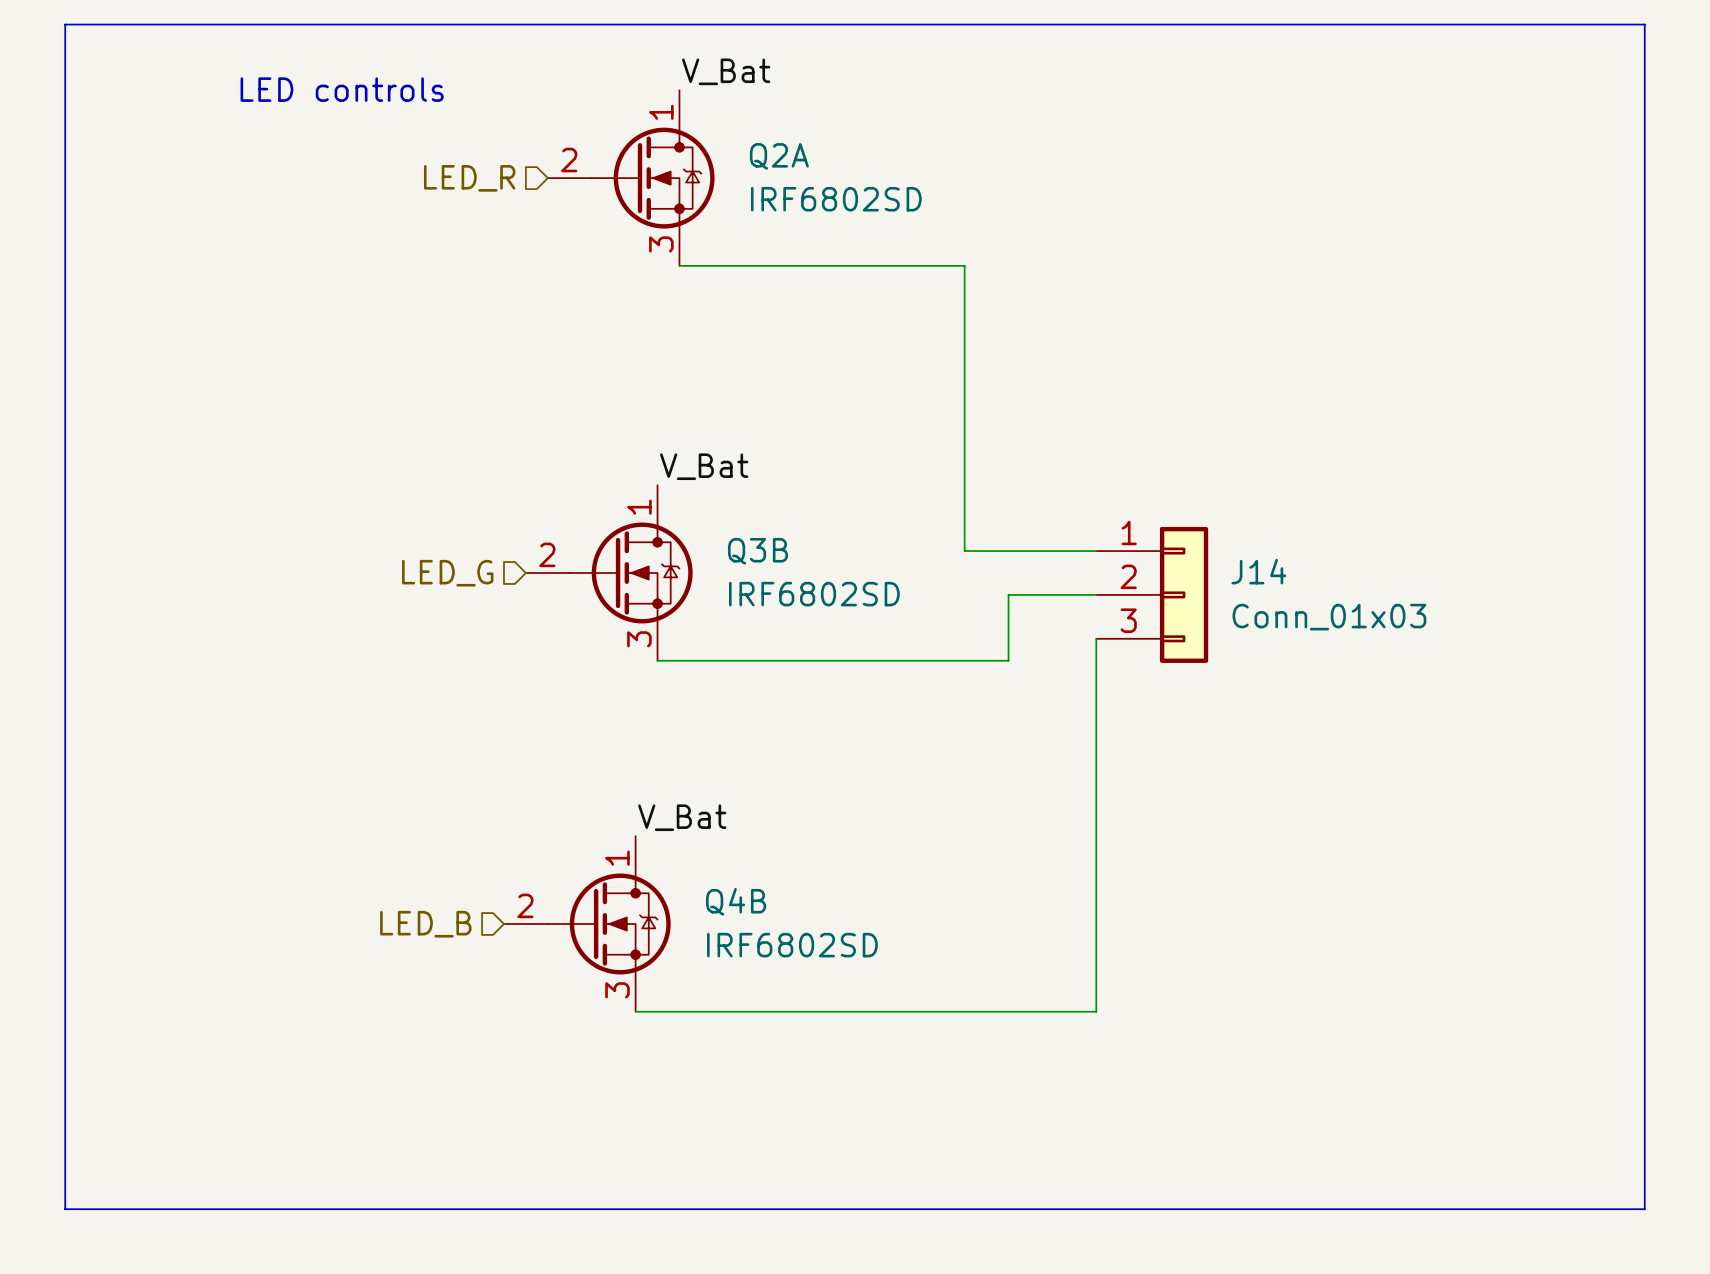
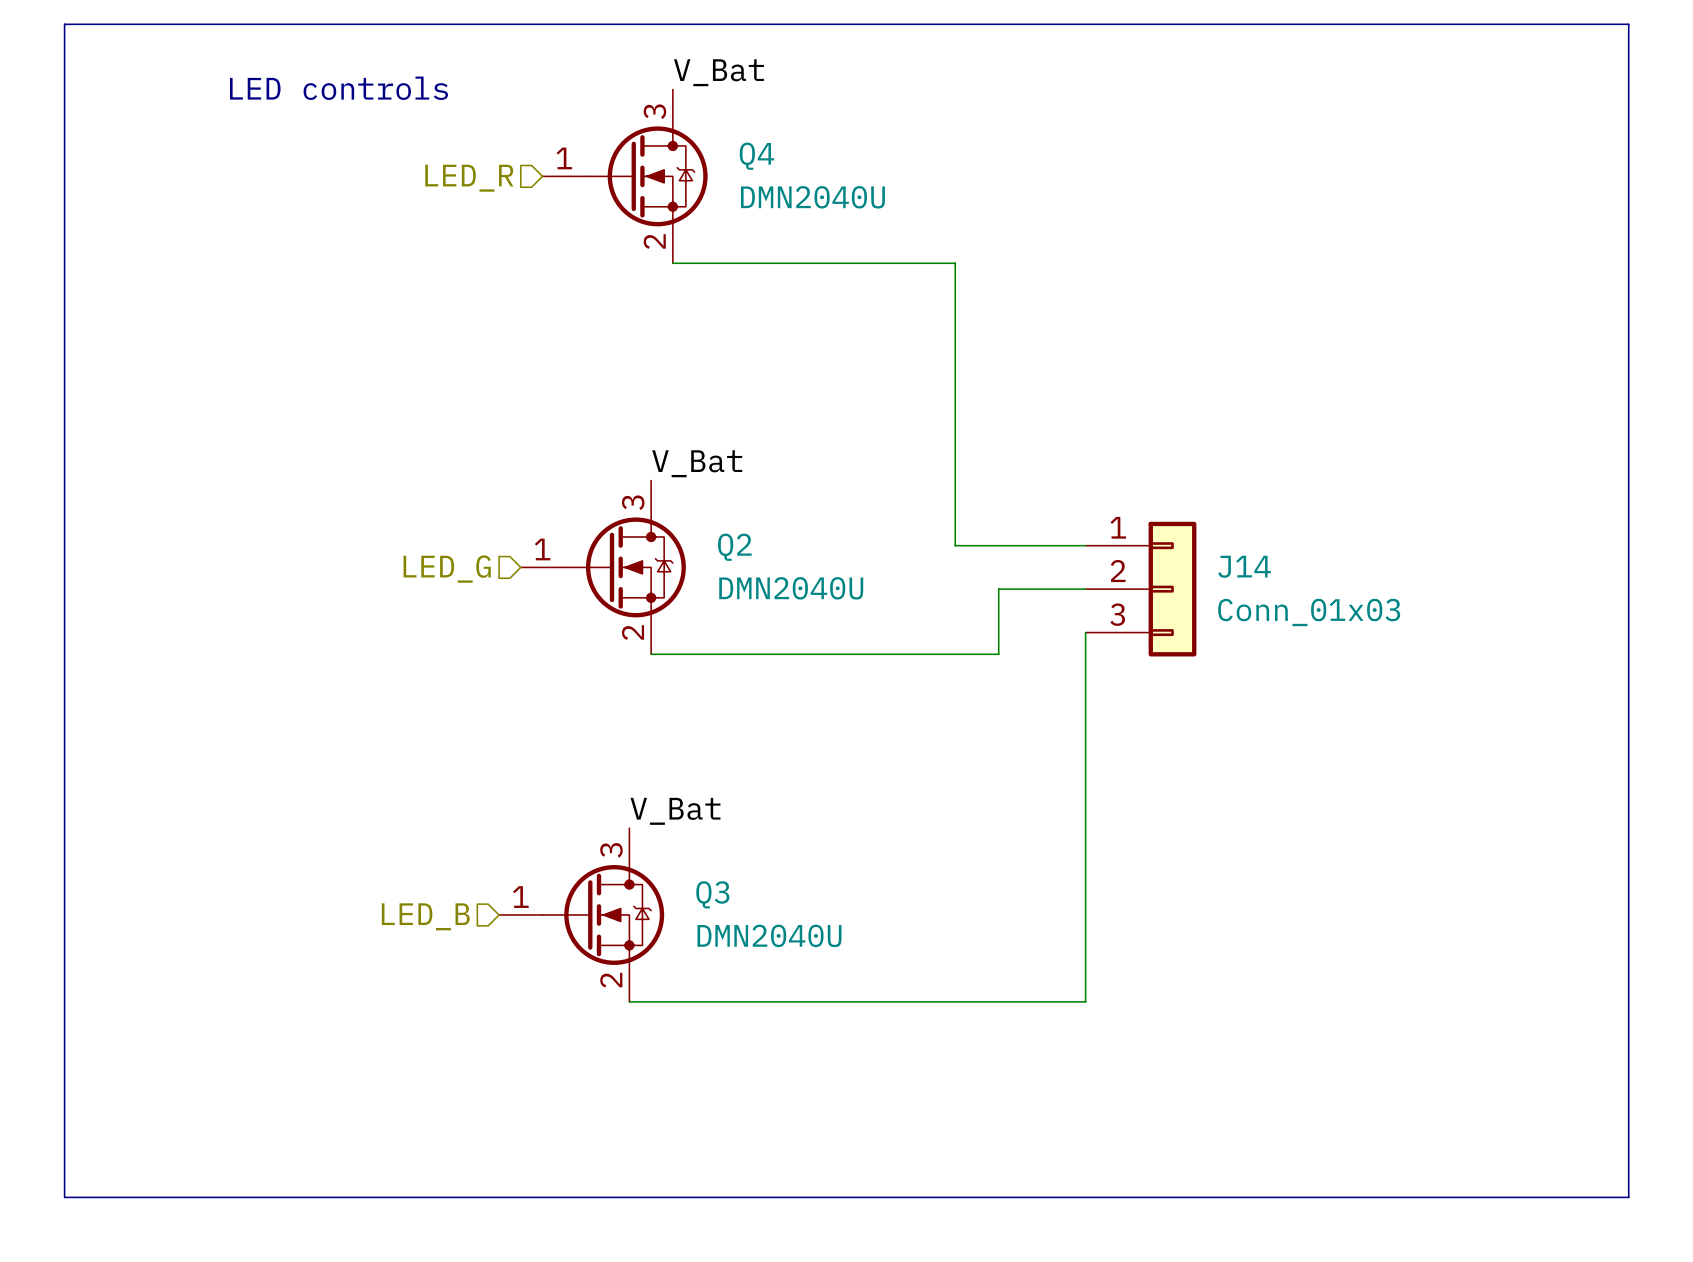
Q2A pin number: 1 (661, 112) -> 3 (654, 111)
Q2A name: Q2A (779, 156) -> Q4 (756, 156)
Q2A pin number: 2 (569, 160) -> 1 (564, 158)
Q2A value: IRF6802SD (836, 199) -> DMN2040U (812, 197)
Q2A pin number: 3 (661, 244) -> 2 (654, 241)
Q3B pin number: 1 (639, 507) -> 3 (633, 502)
Q3B name: Q3B (757, 551) -> Q2 (734, 547)
Q3B pin number: 2 (547, 554) -> 1 (542, 549)
Q3B value: IRF6802SD (814, 594) -> DMN2040U (791, 588)
Q3B pin number: 3 (639, 639) -> 2 (633, 632)
Q4B pin number: 1 (617, 858) -> 3 (611, 850)
Q4B name: Q4B (736, 901) -> Q3 (712, 894)
Q4B pin number: 2 (525, 905) -> 1 (520, 897)
Q4B value: IRF6802SD (792, 945) -> DMN2040U (769, 935)
Q4B pin number: 3 (617, 990) -> 2 (611, 980)

